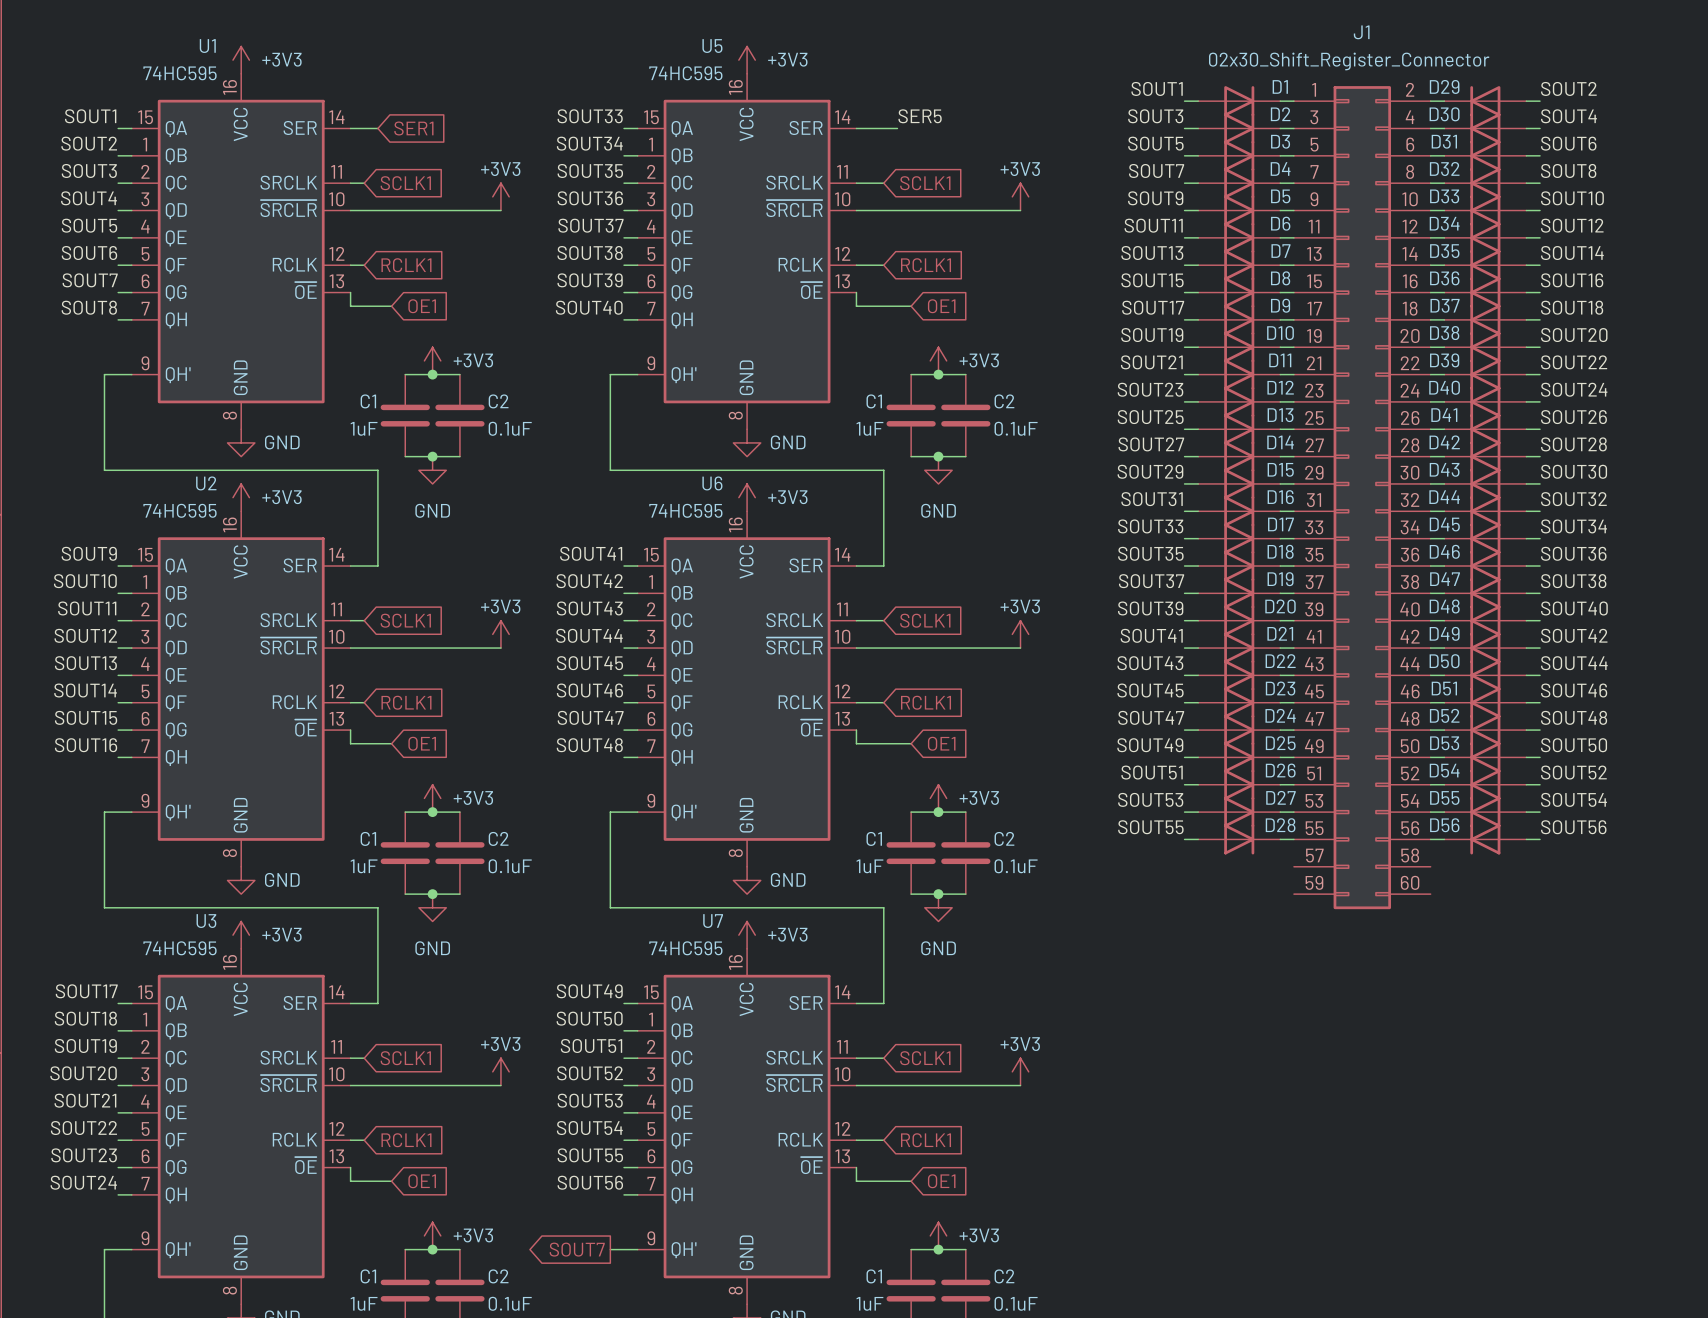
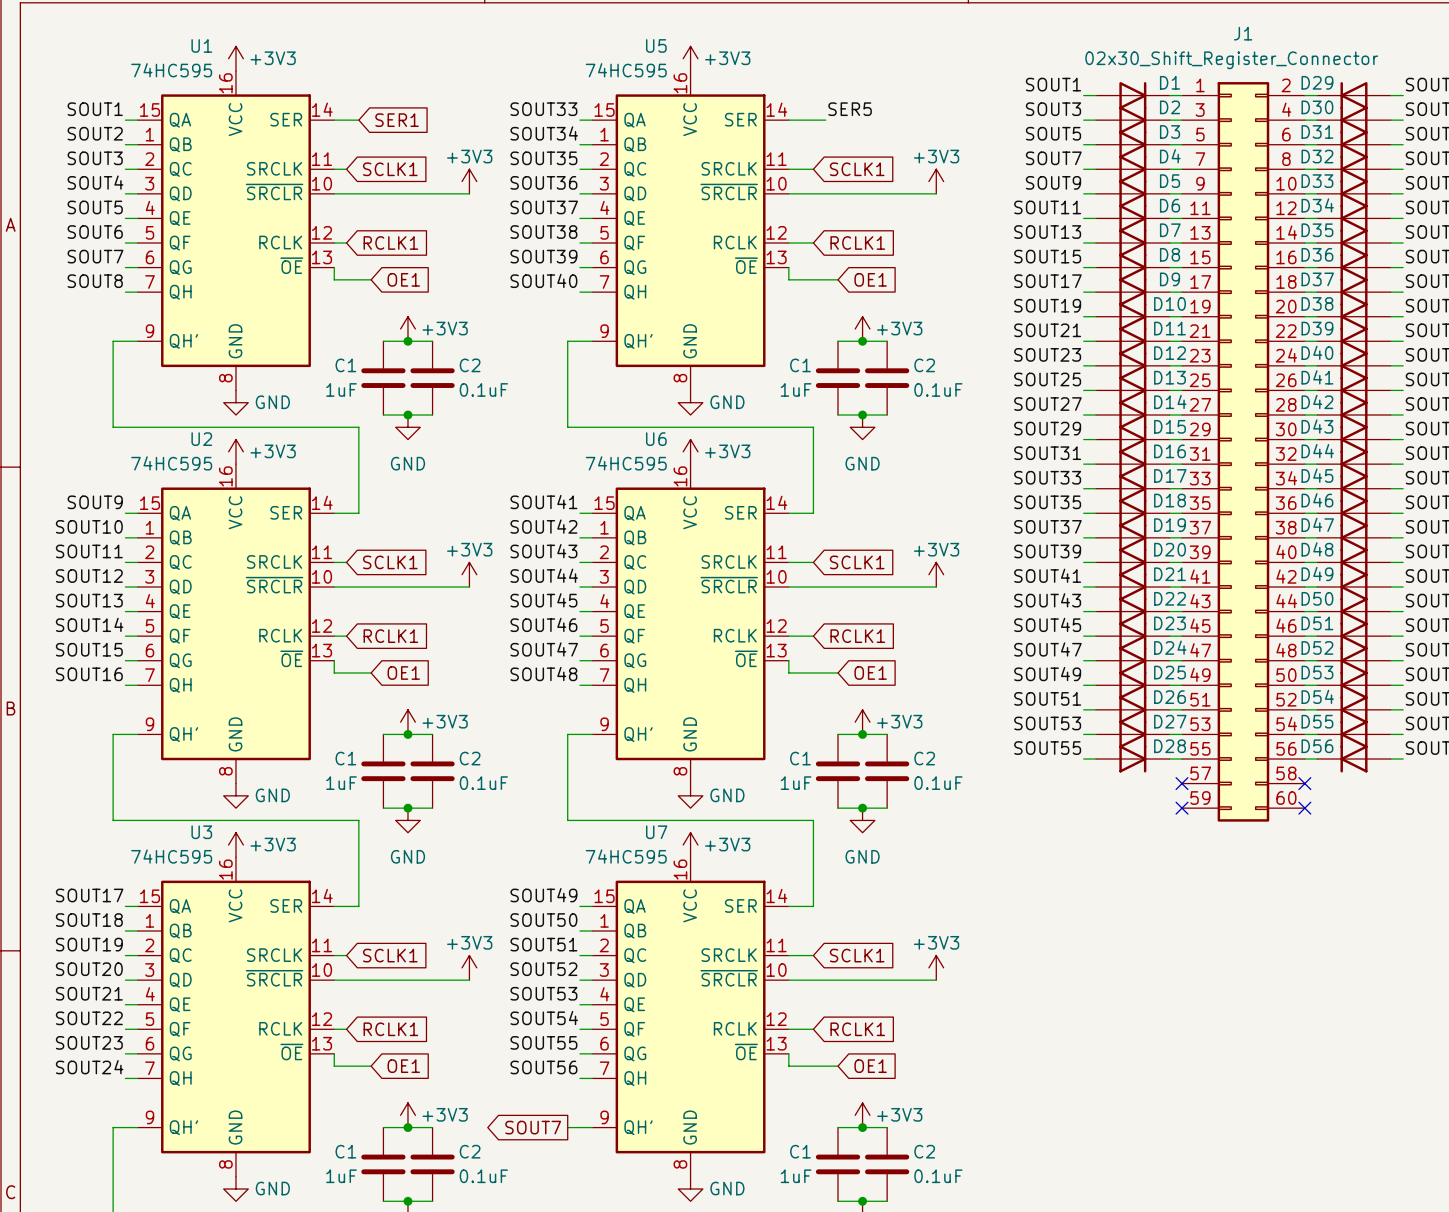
no-connect mark: none -> (1182, 783)
no-connect mark: none -> (1304, 783)
no-connect mark: none -> (1182, 808)
no-connect mark: none -> (1304, 808)

